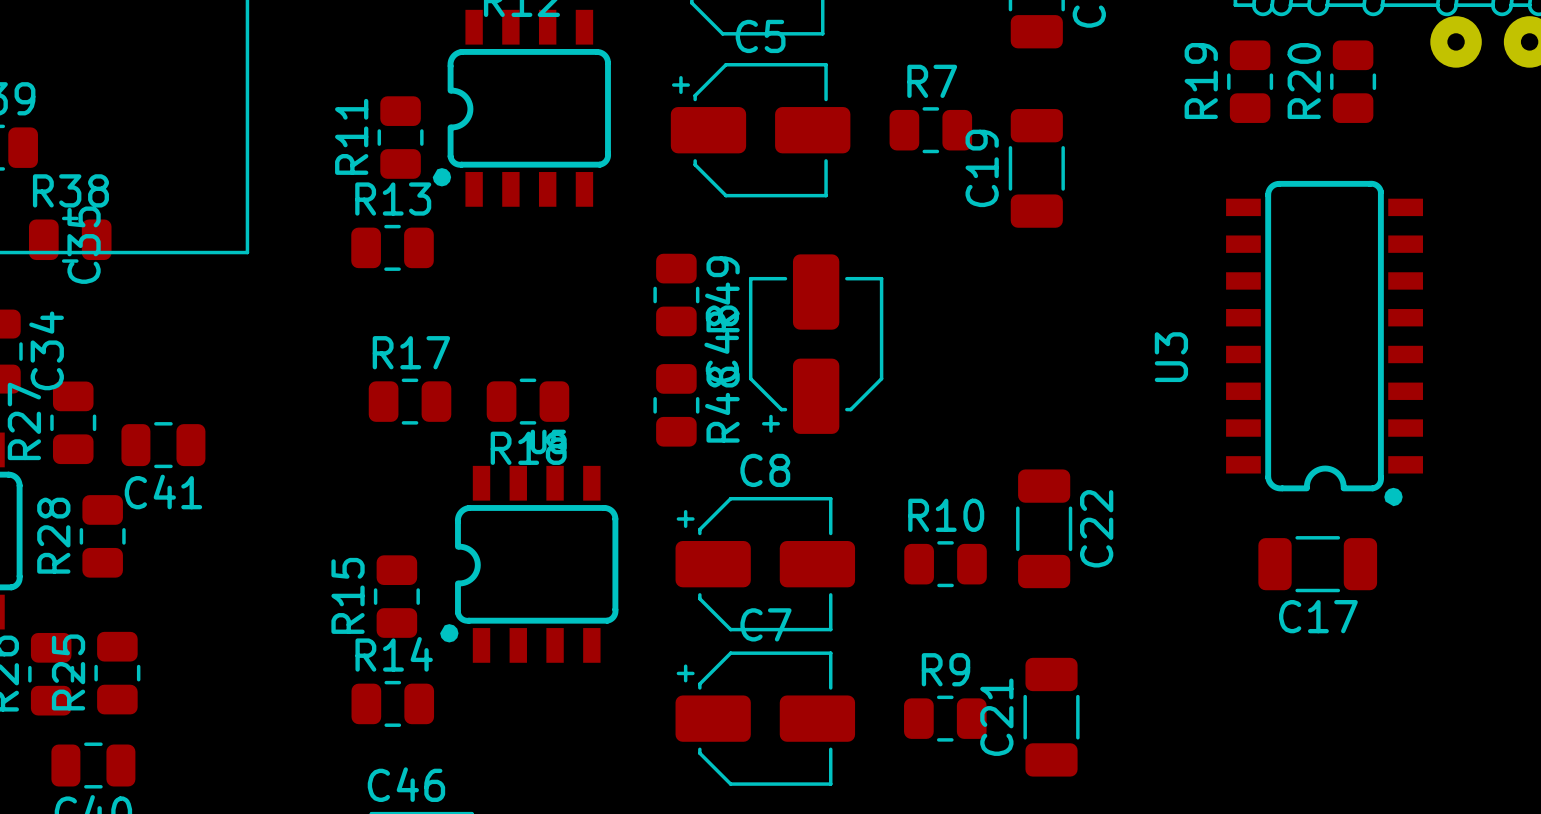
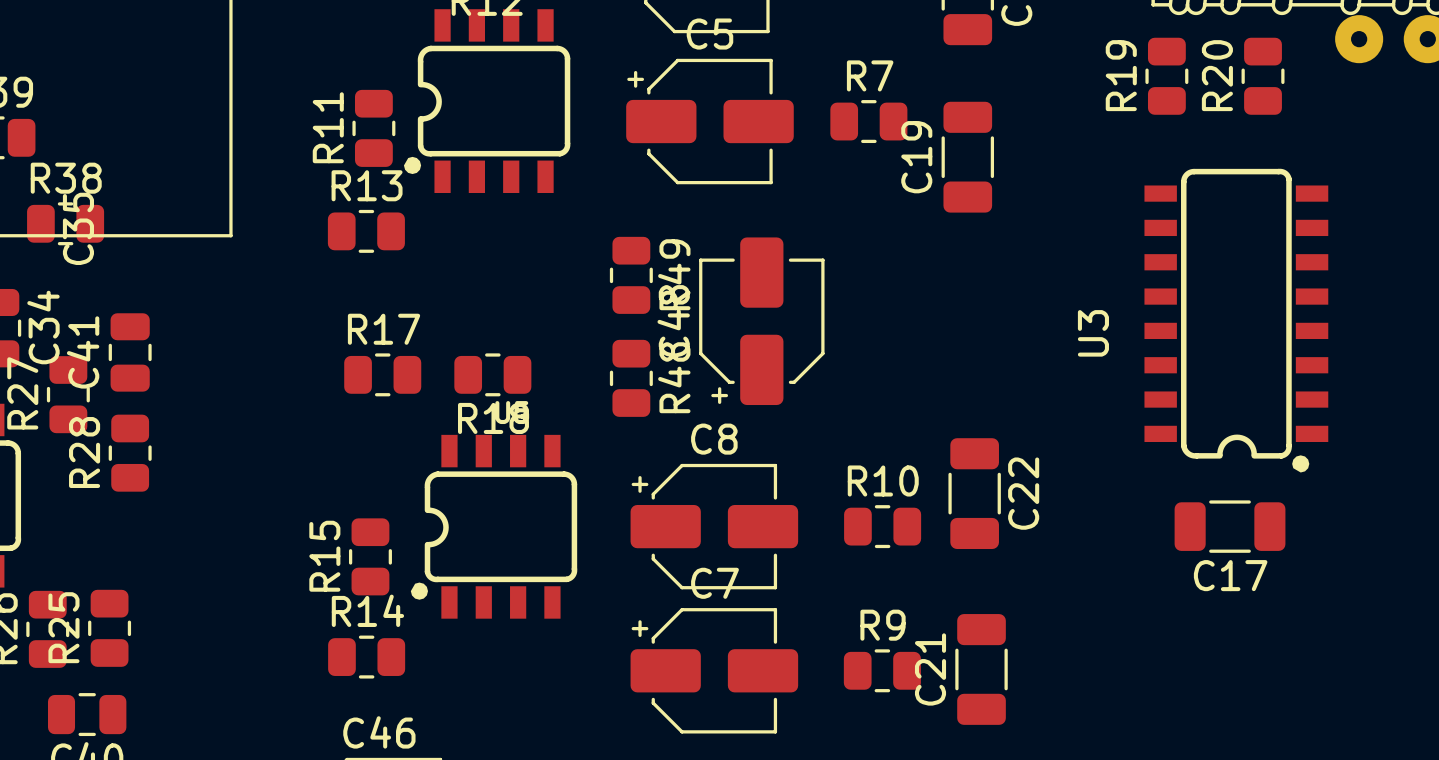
C41 rotation: 0° (163, 445) -> 90° clockwise (130, 352)
C41 position: (163, 445) -> (130, 352)
R28 position: (102, 536) -> (130, 453)

